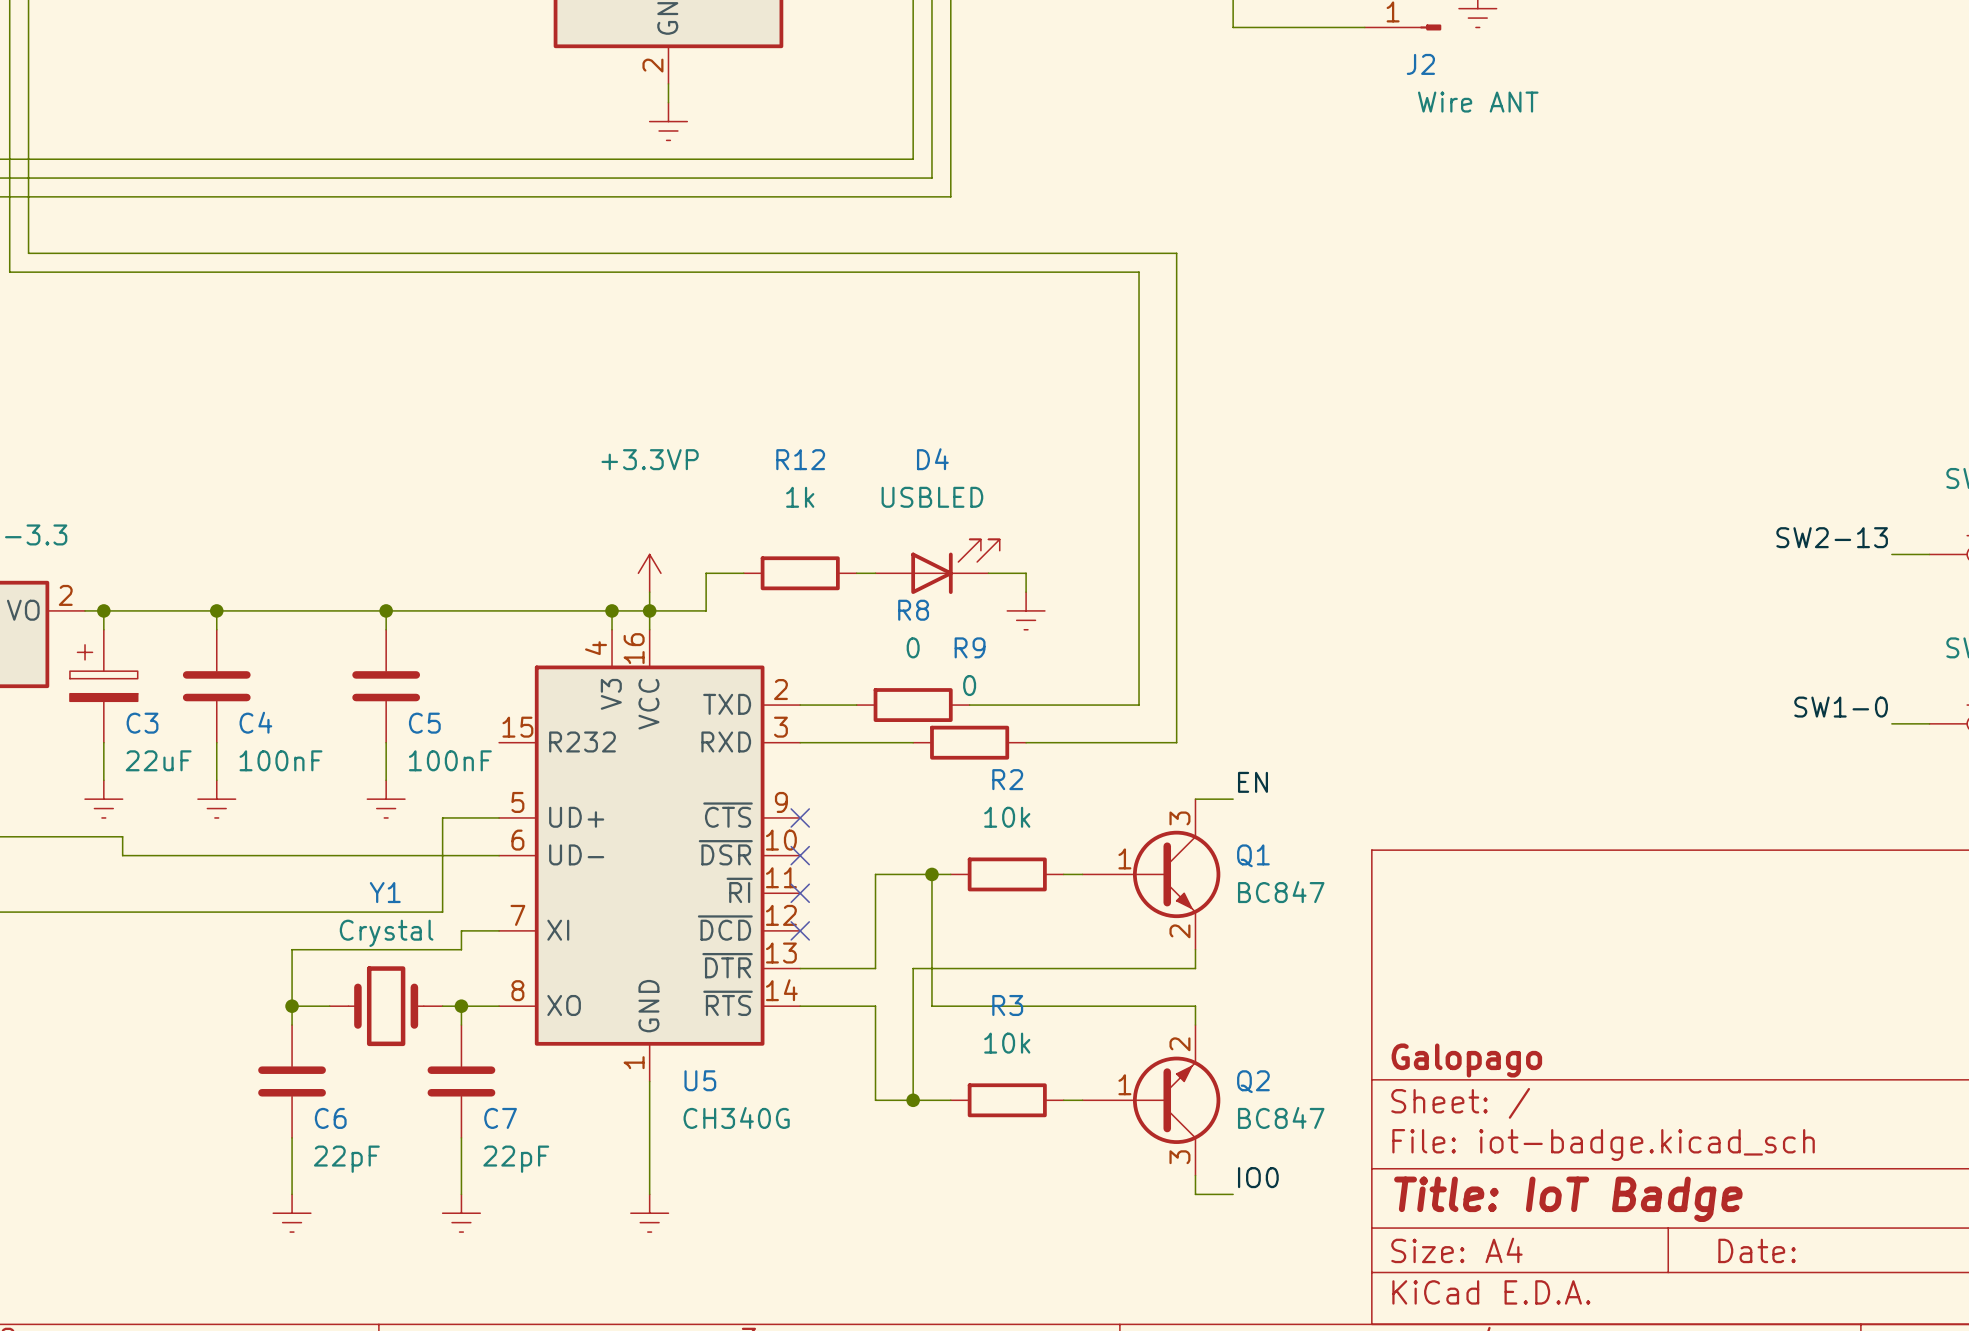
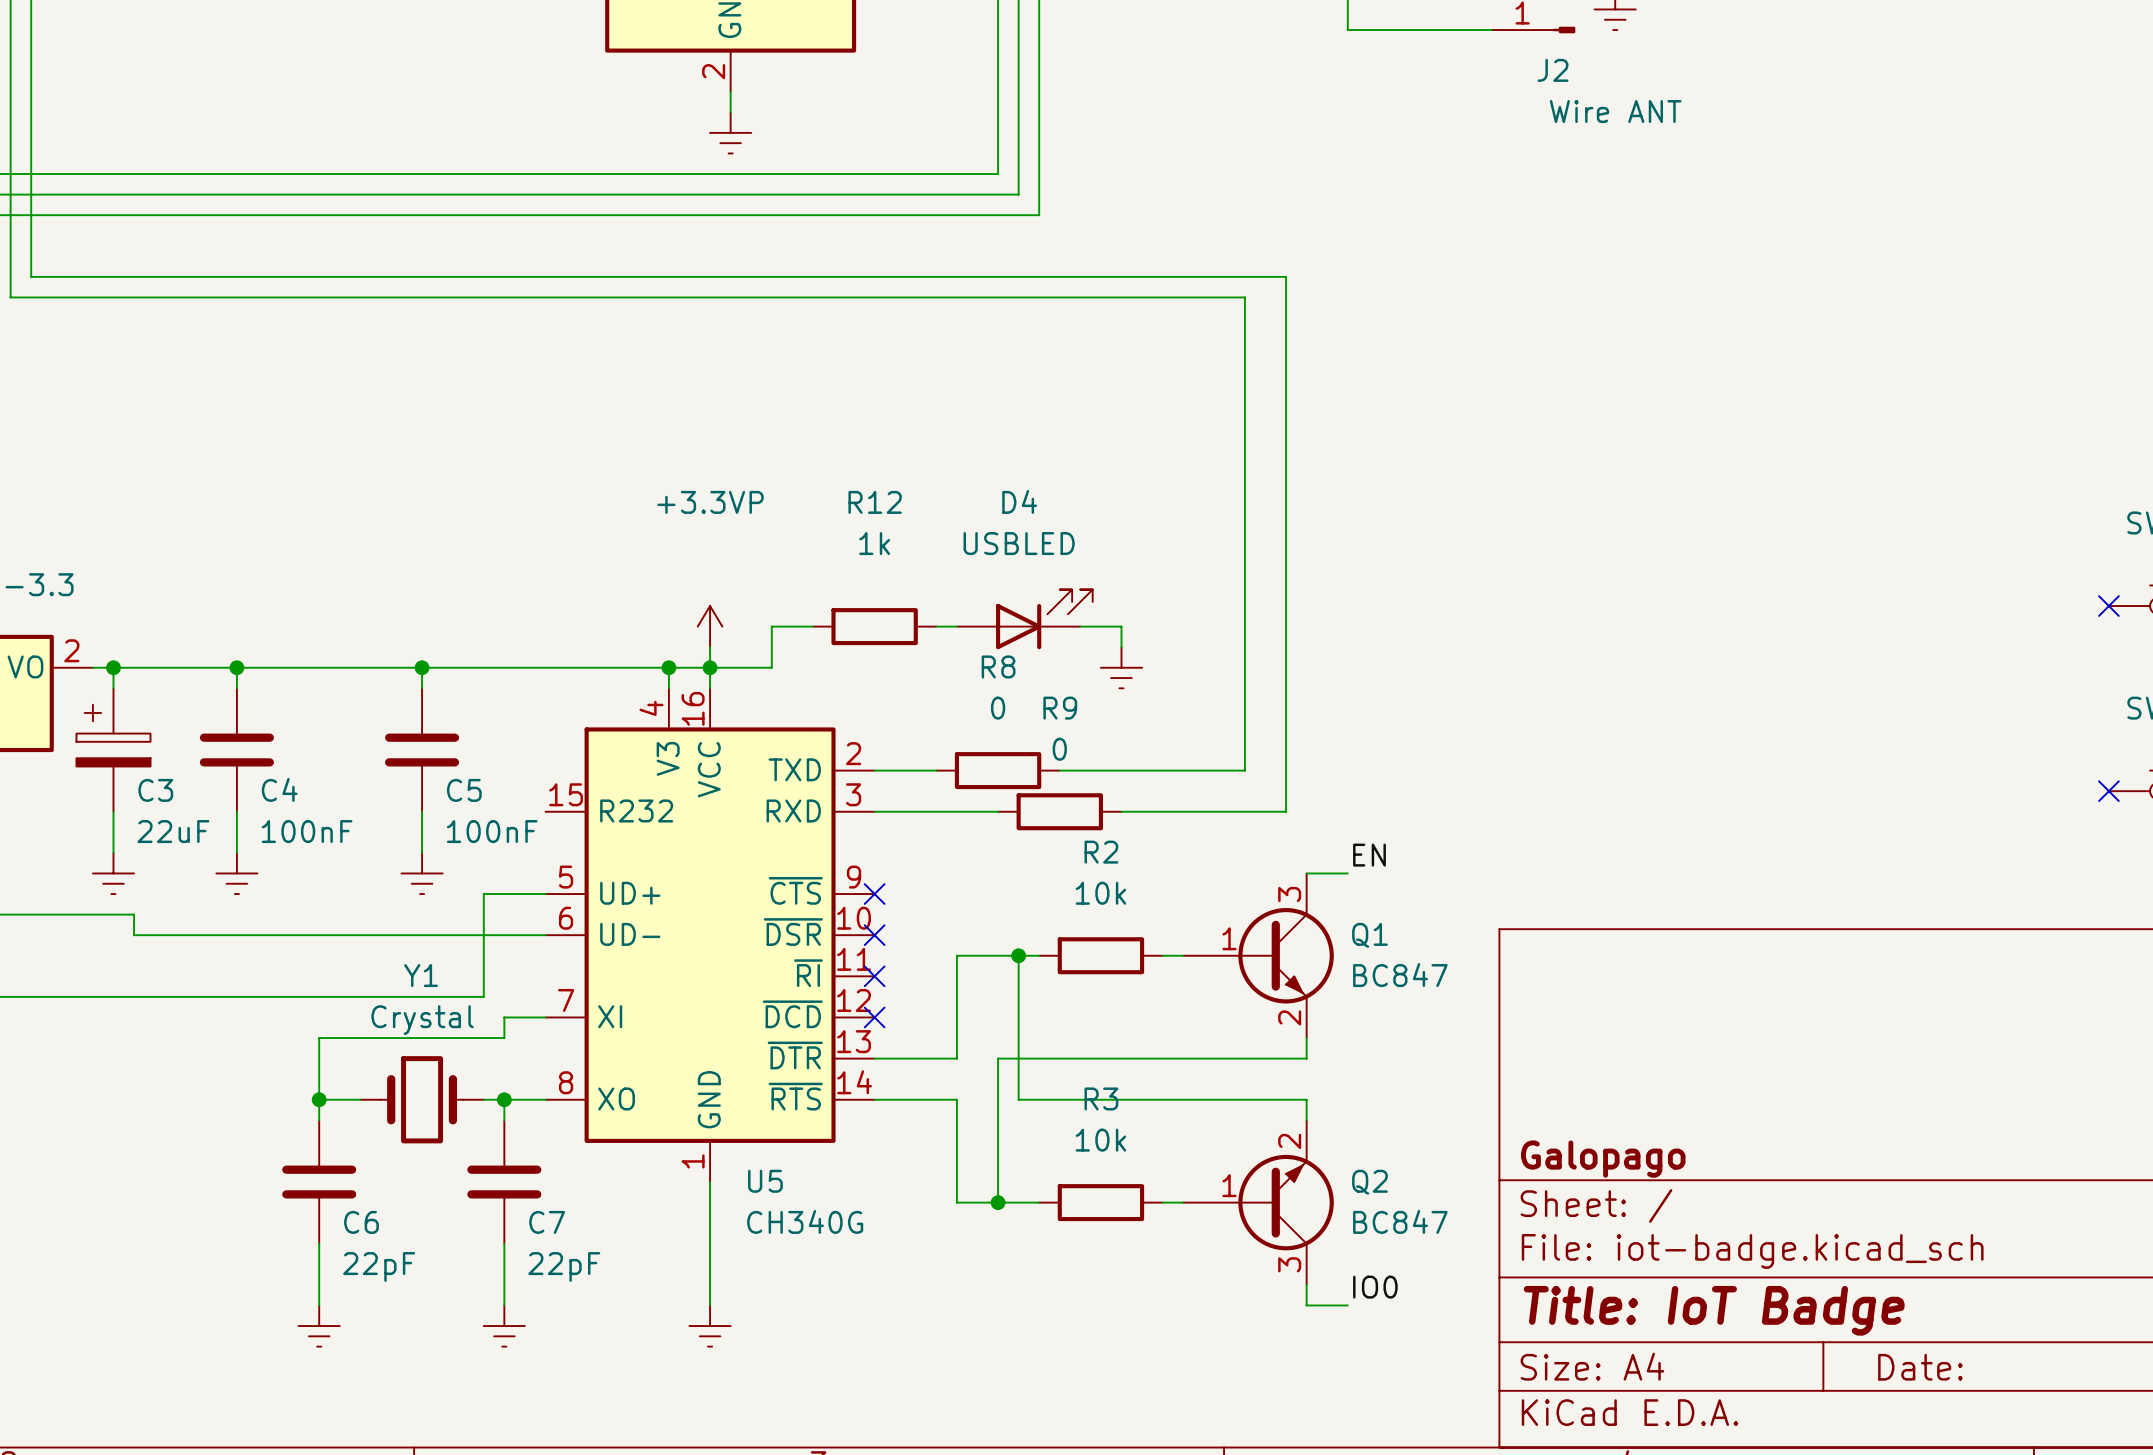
label: SW2-13 (1832, 537) -> none
wire: (1891, 554) (1929, 554) -> none
no-connect mark: none -> (2108, 606)
label: SW1-0 (1841, 707) -> none
wire: (1891, 723) (1929, 723) -> none
no-connect mark: none -> (2108, 791)

